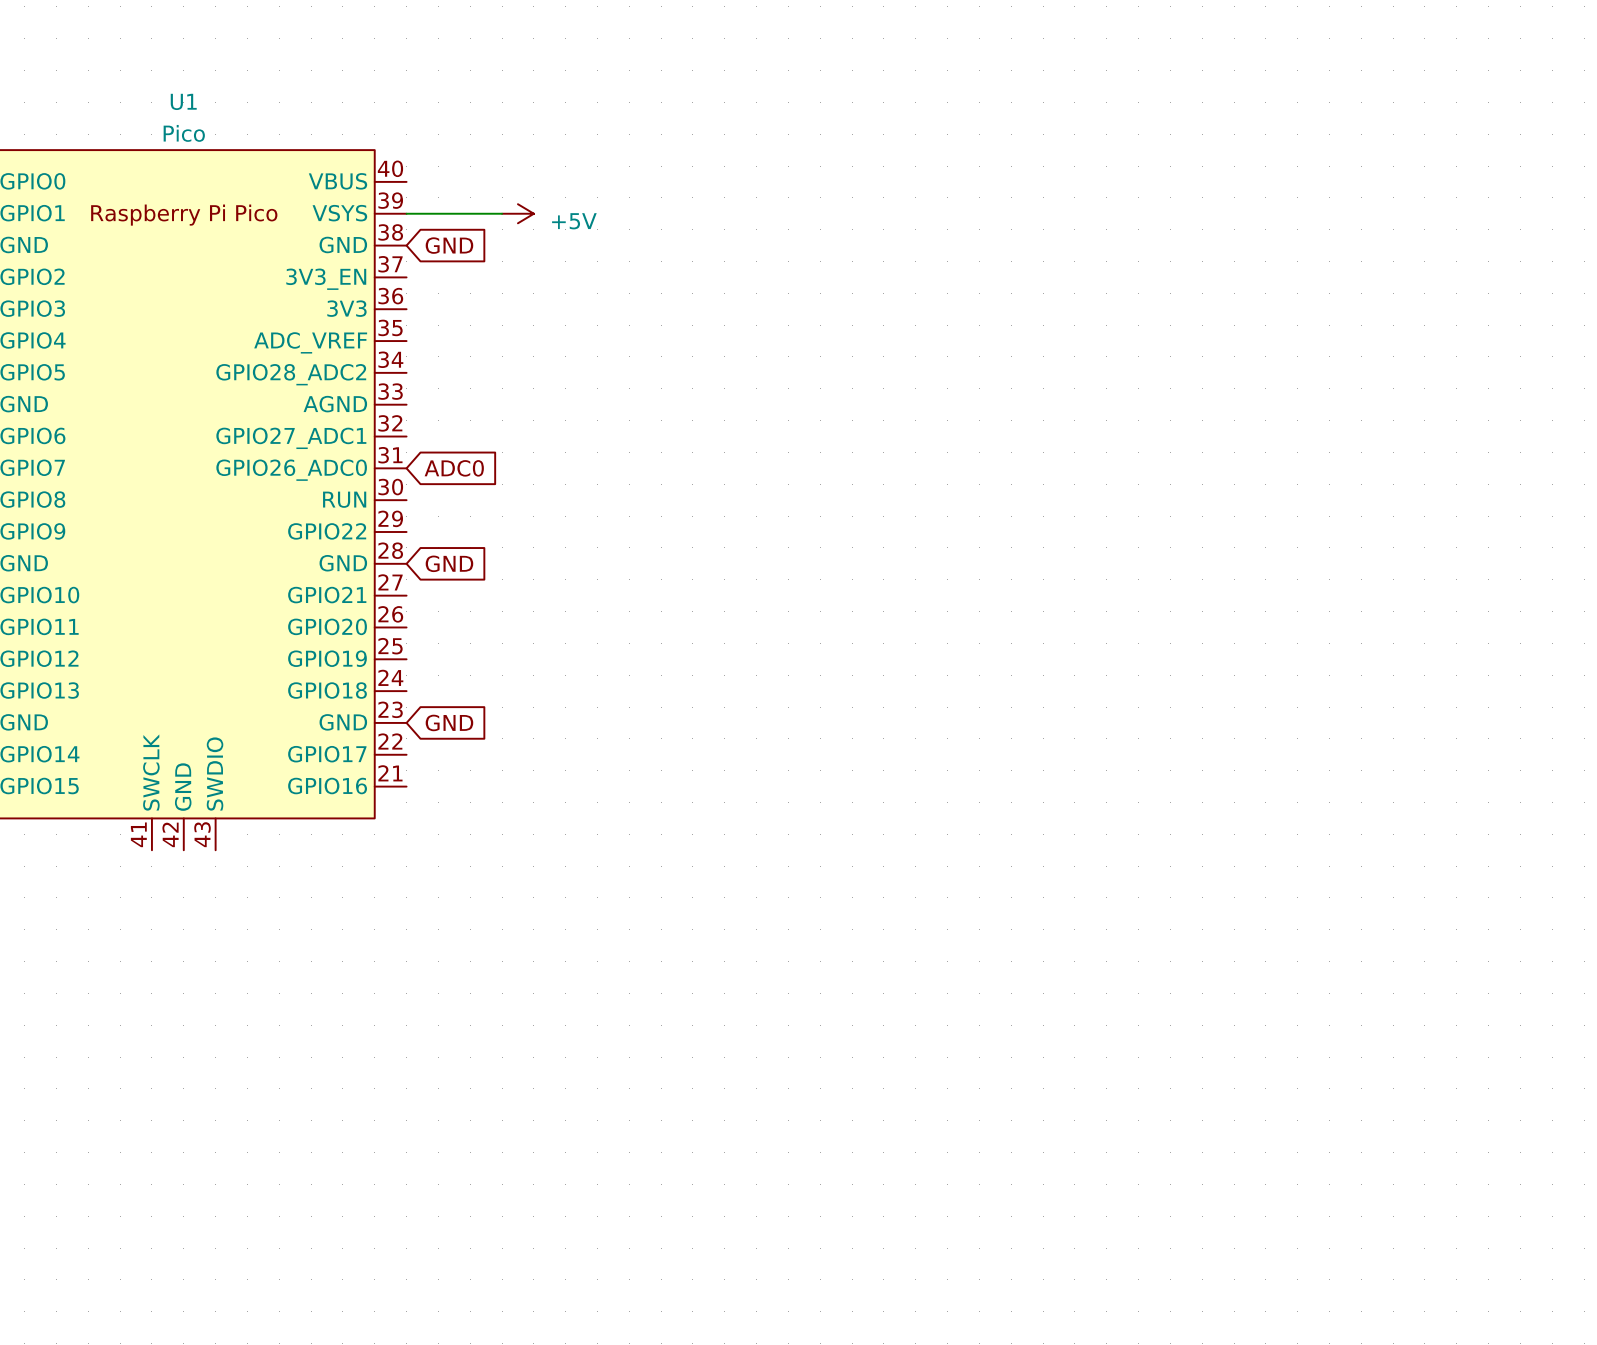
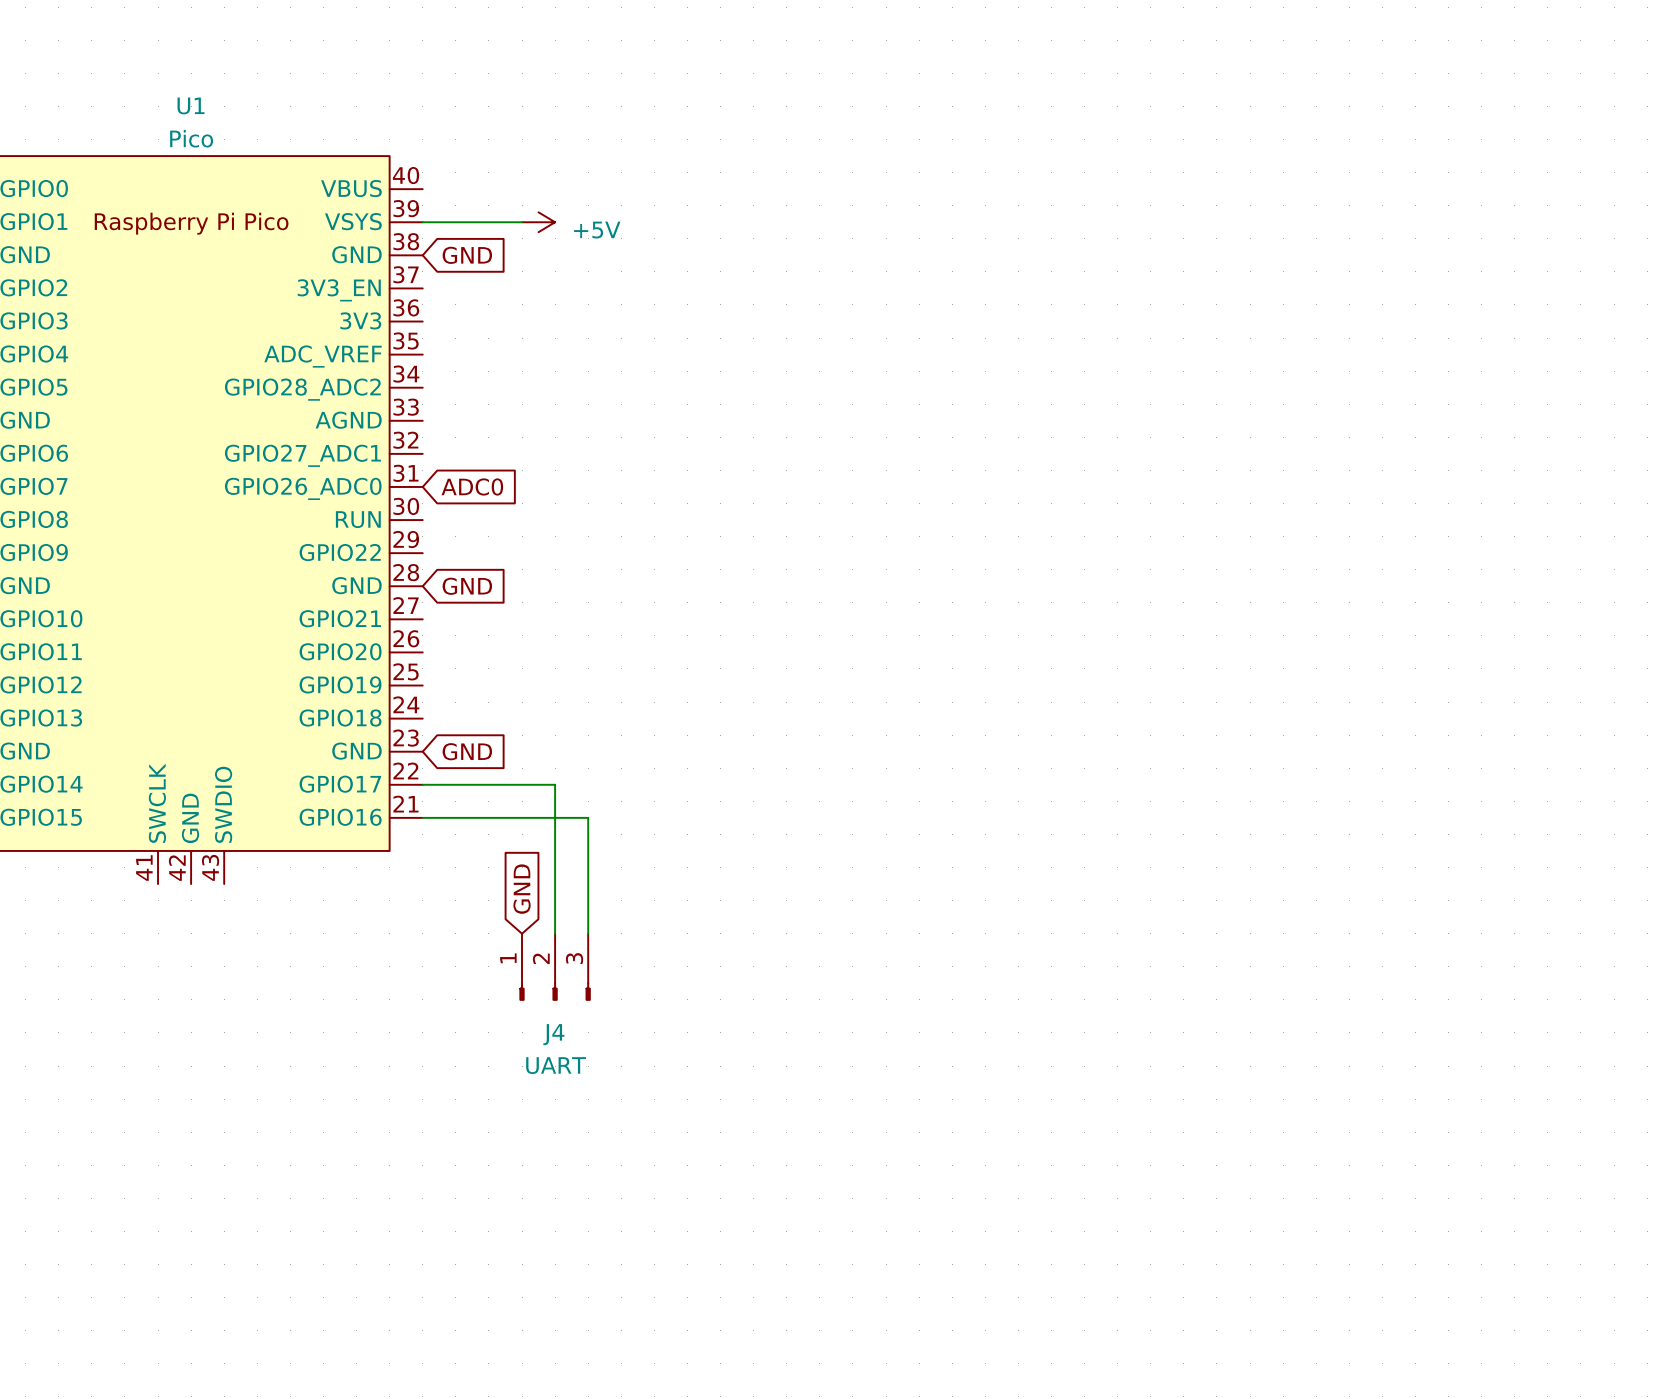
wire: none -> (422, 784) (555, 784) (555, 933)
wire: none -> (422, 817) (588, 817) (588, 933)
global label: none -> GND (522, 889)
J4: none -> UART (555, 967)

